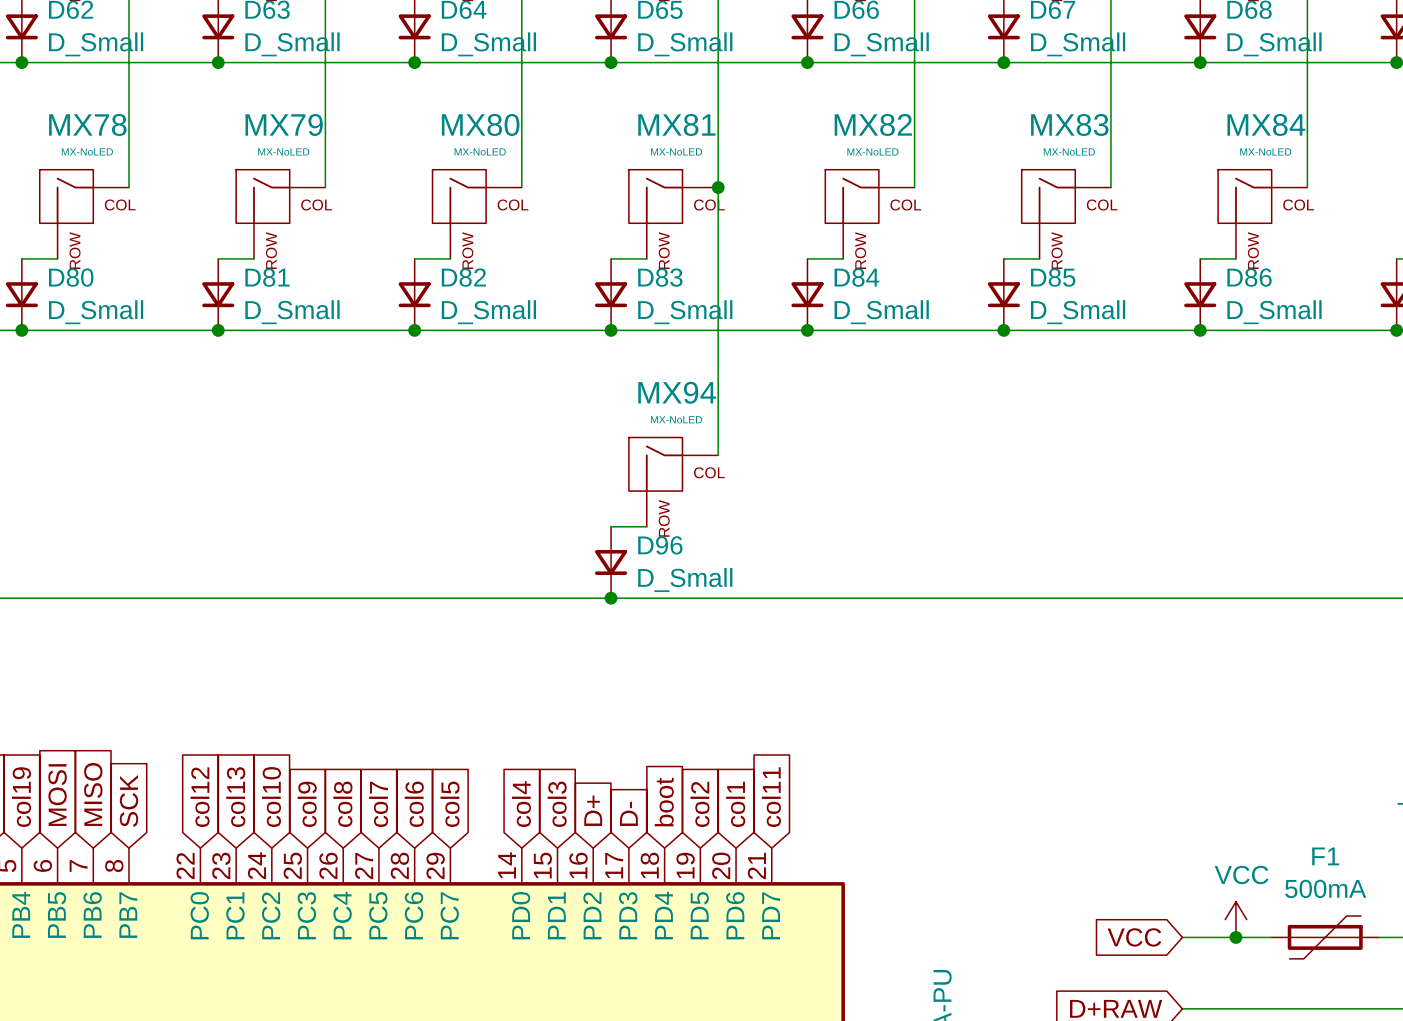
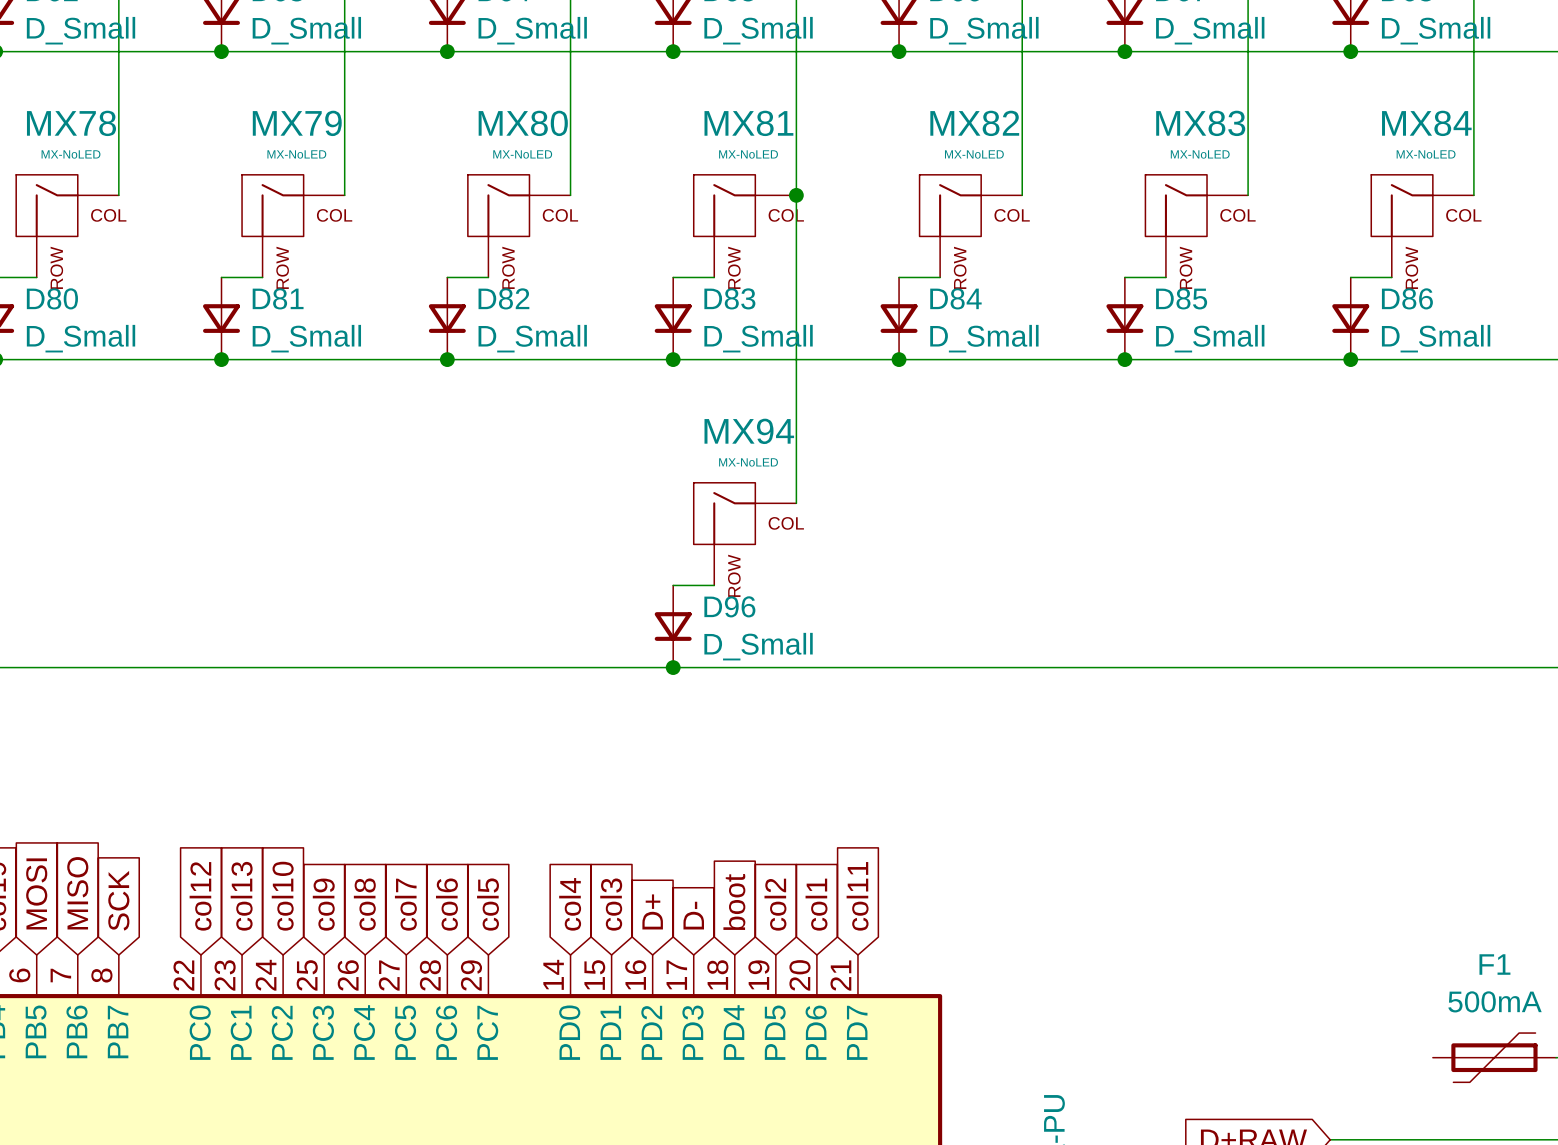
power symbol: VCC (1235, 919) -> none
global label: VCC (1134, 937) -> none
wire: (1182, 937) (1271, 937) -> none
junction: (1235, 937) -> none

